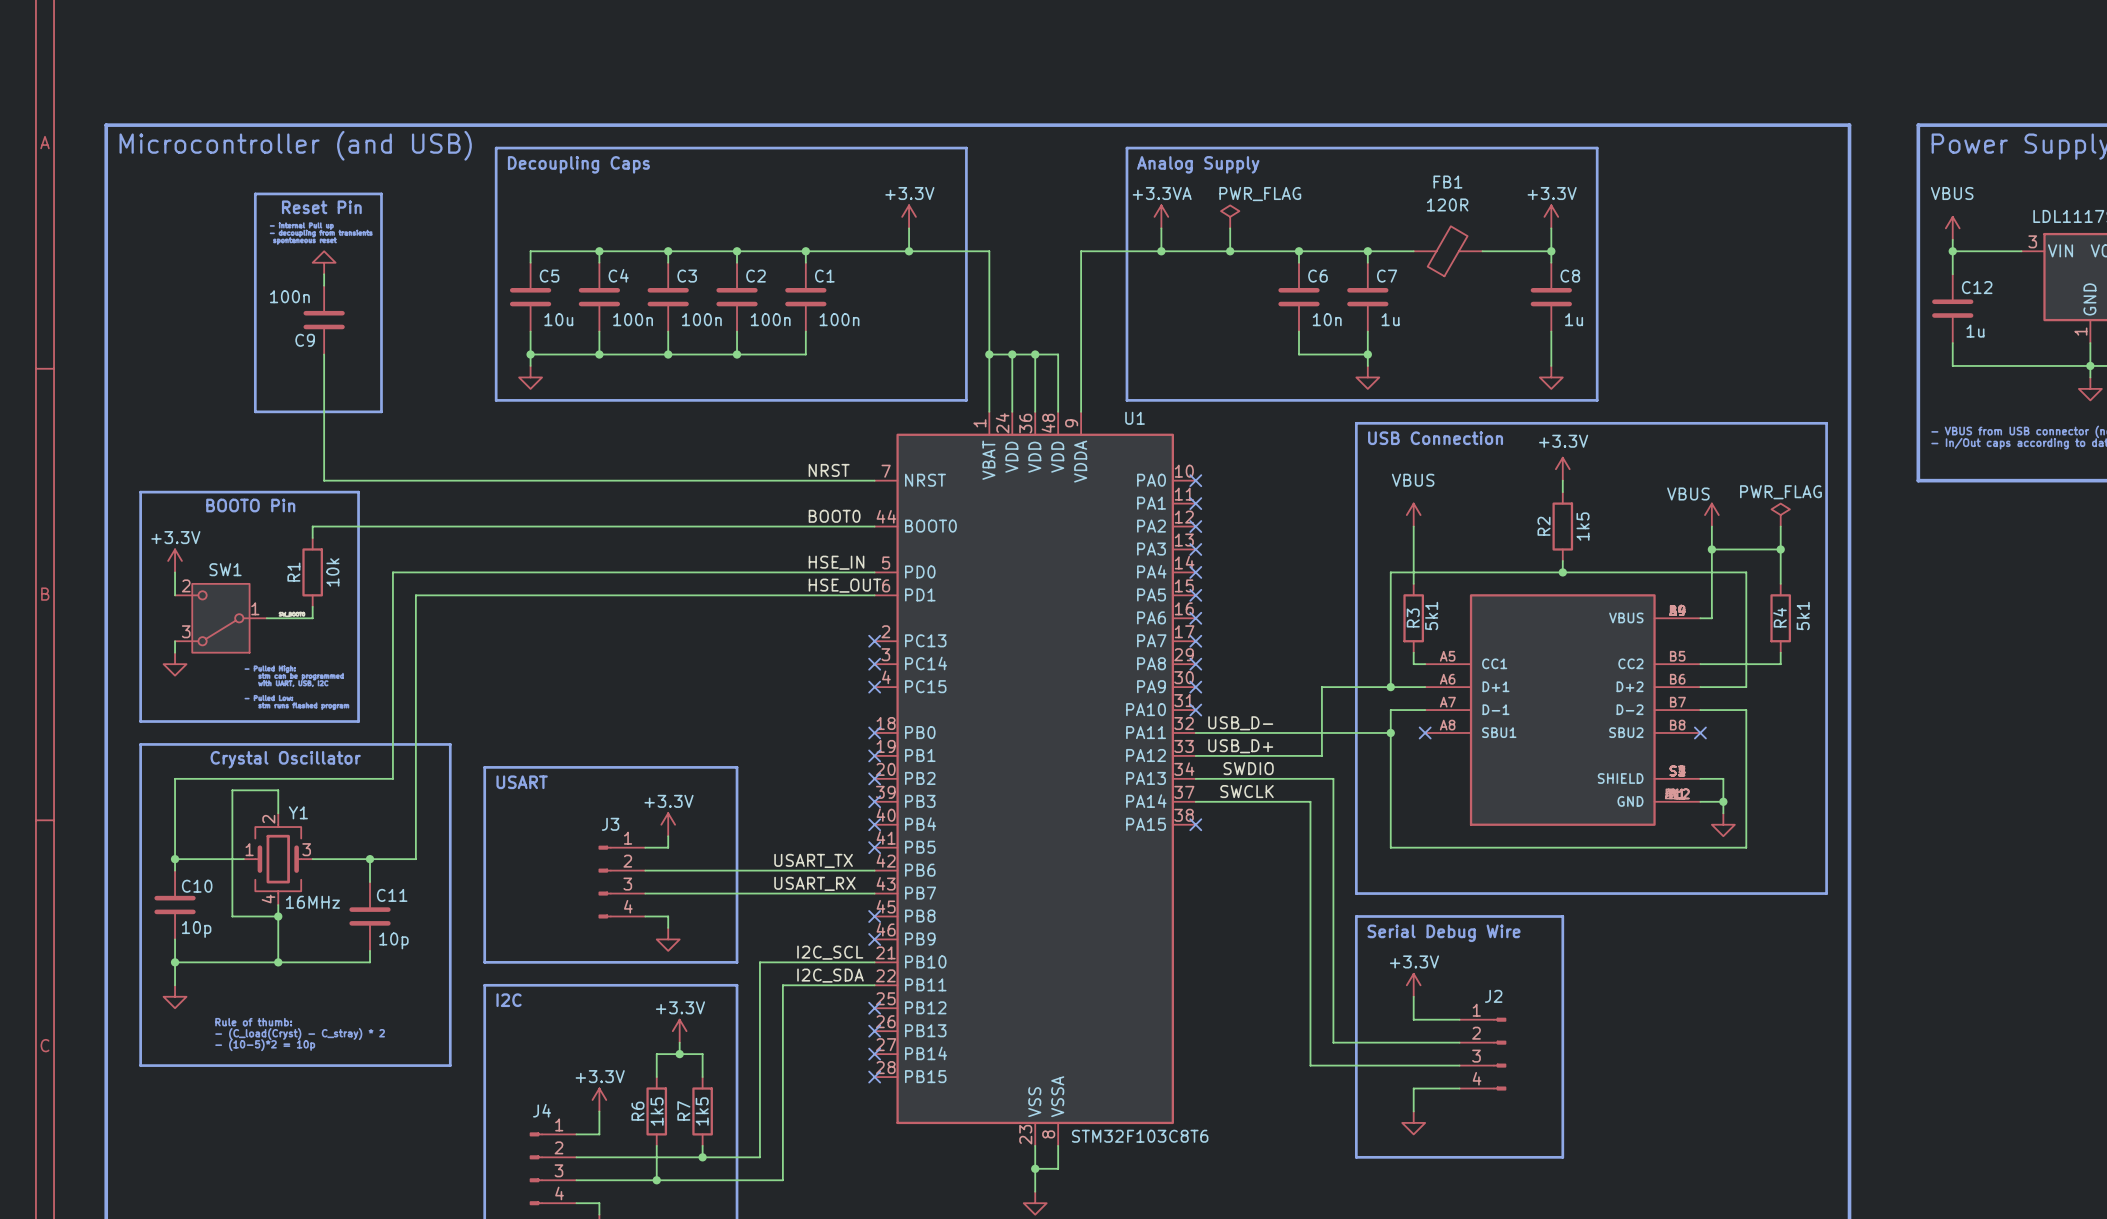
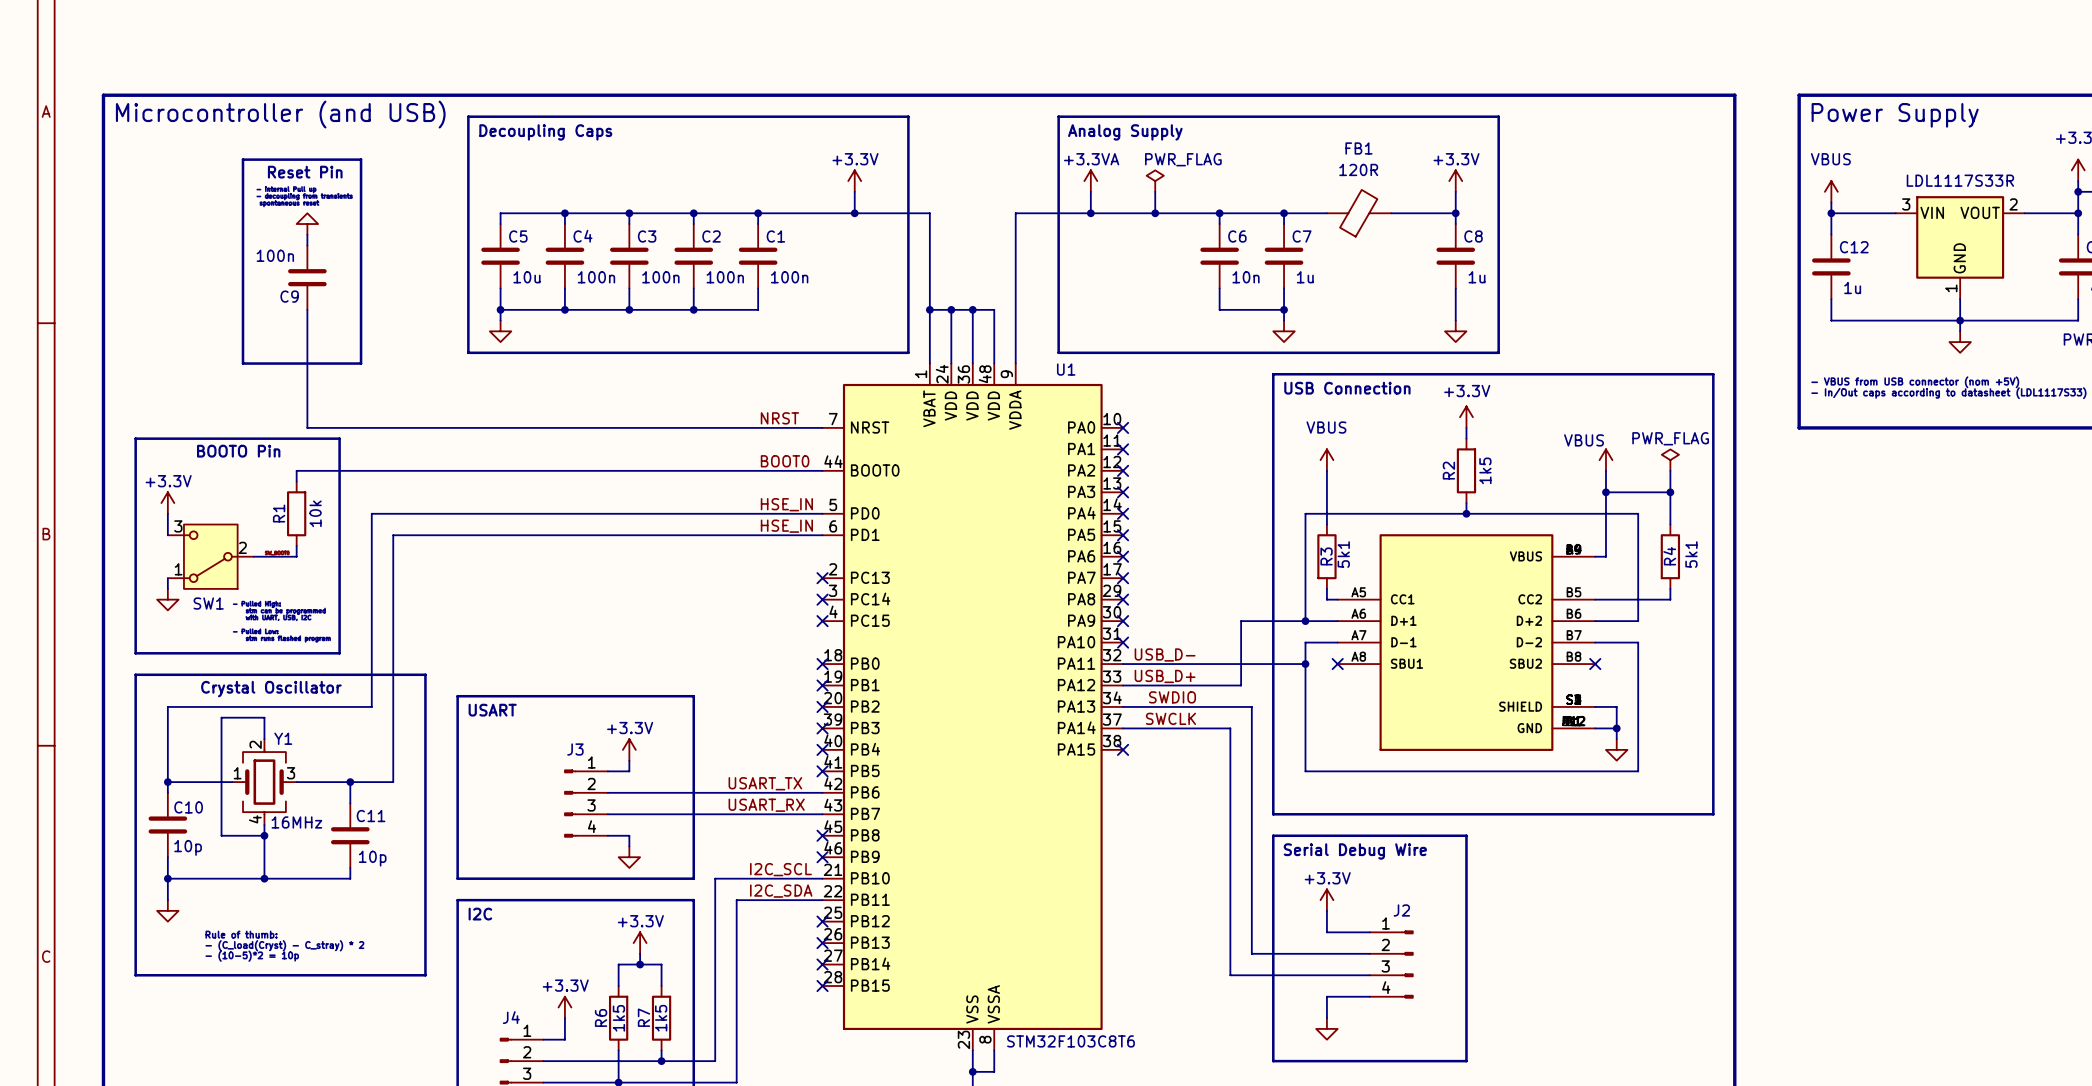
SW1 name position: SW1 (225, 569) -> SW1 (208, 603)
SW1 pin number: 2 (186, 585) -> 3 (178, 526)
label: HSE_OUT (845, 585) -> HSE_IN (786, 526)
SW1 pin number: 1 (255, 608) -> 2 (242, 547)
SW1 pin number: 3 (186, 631) -> 1 (178, 569)

